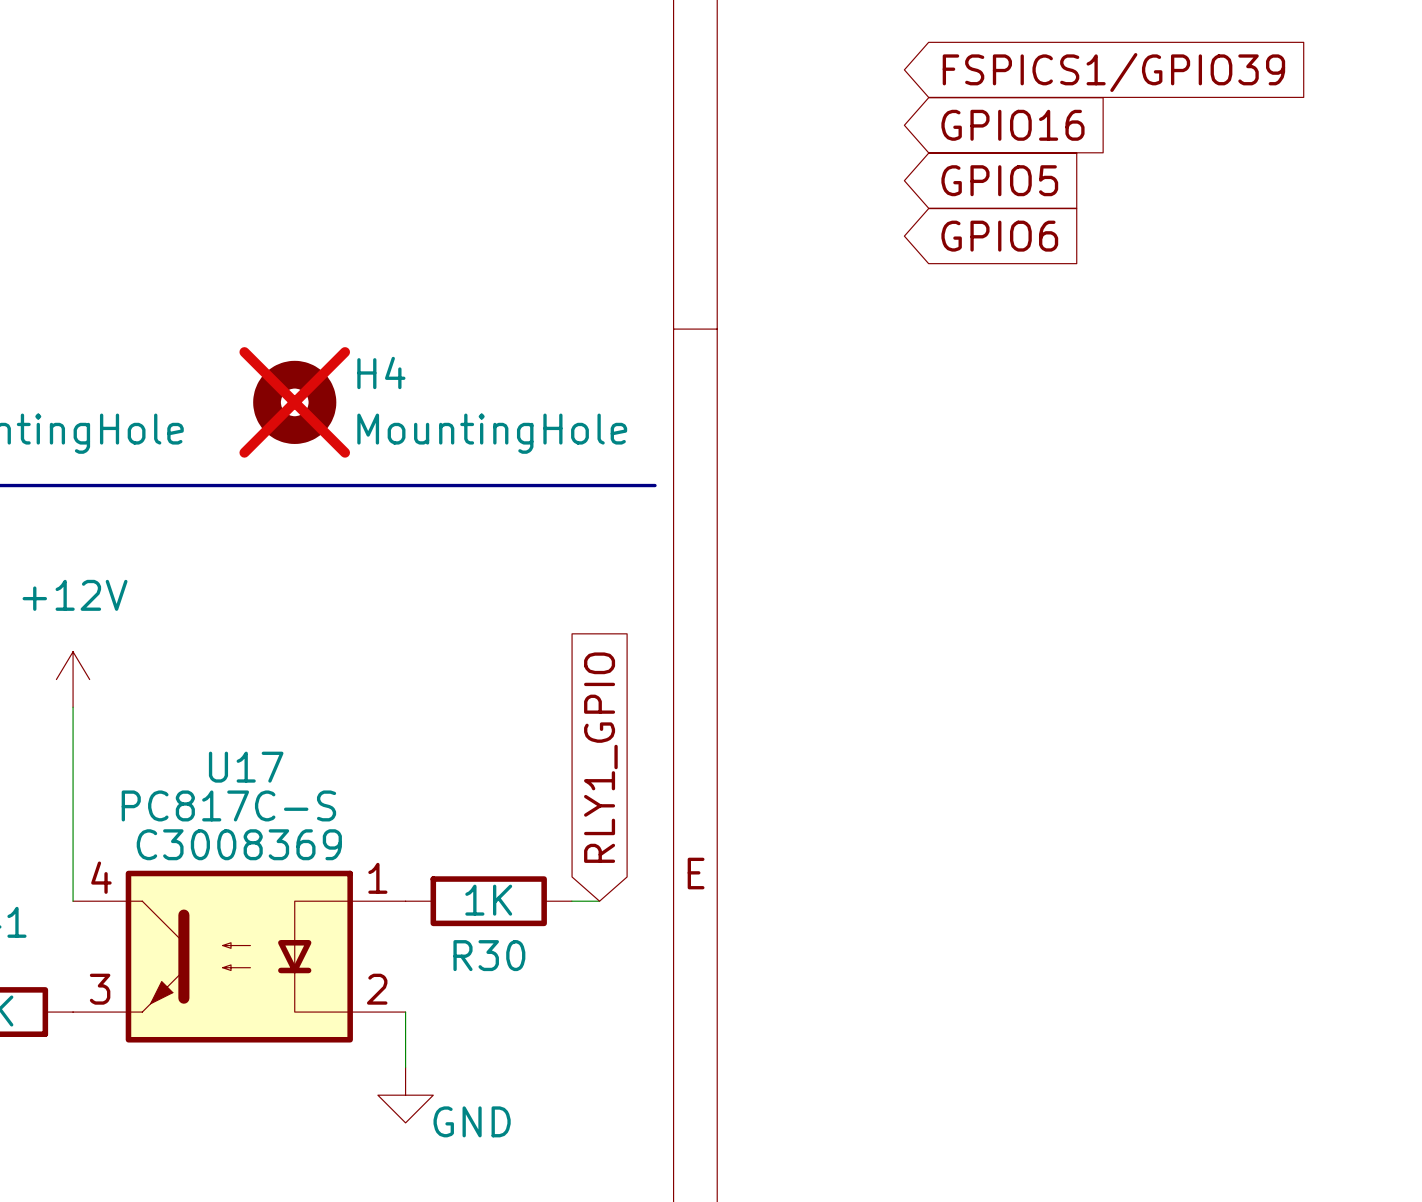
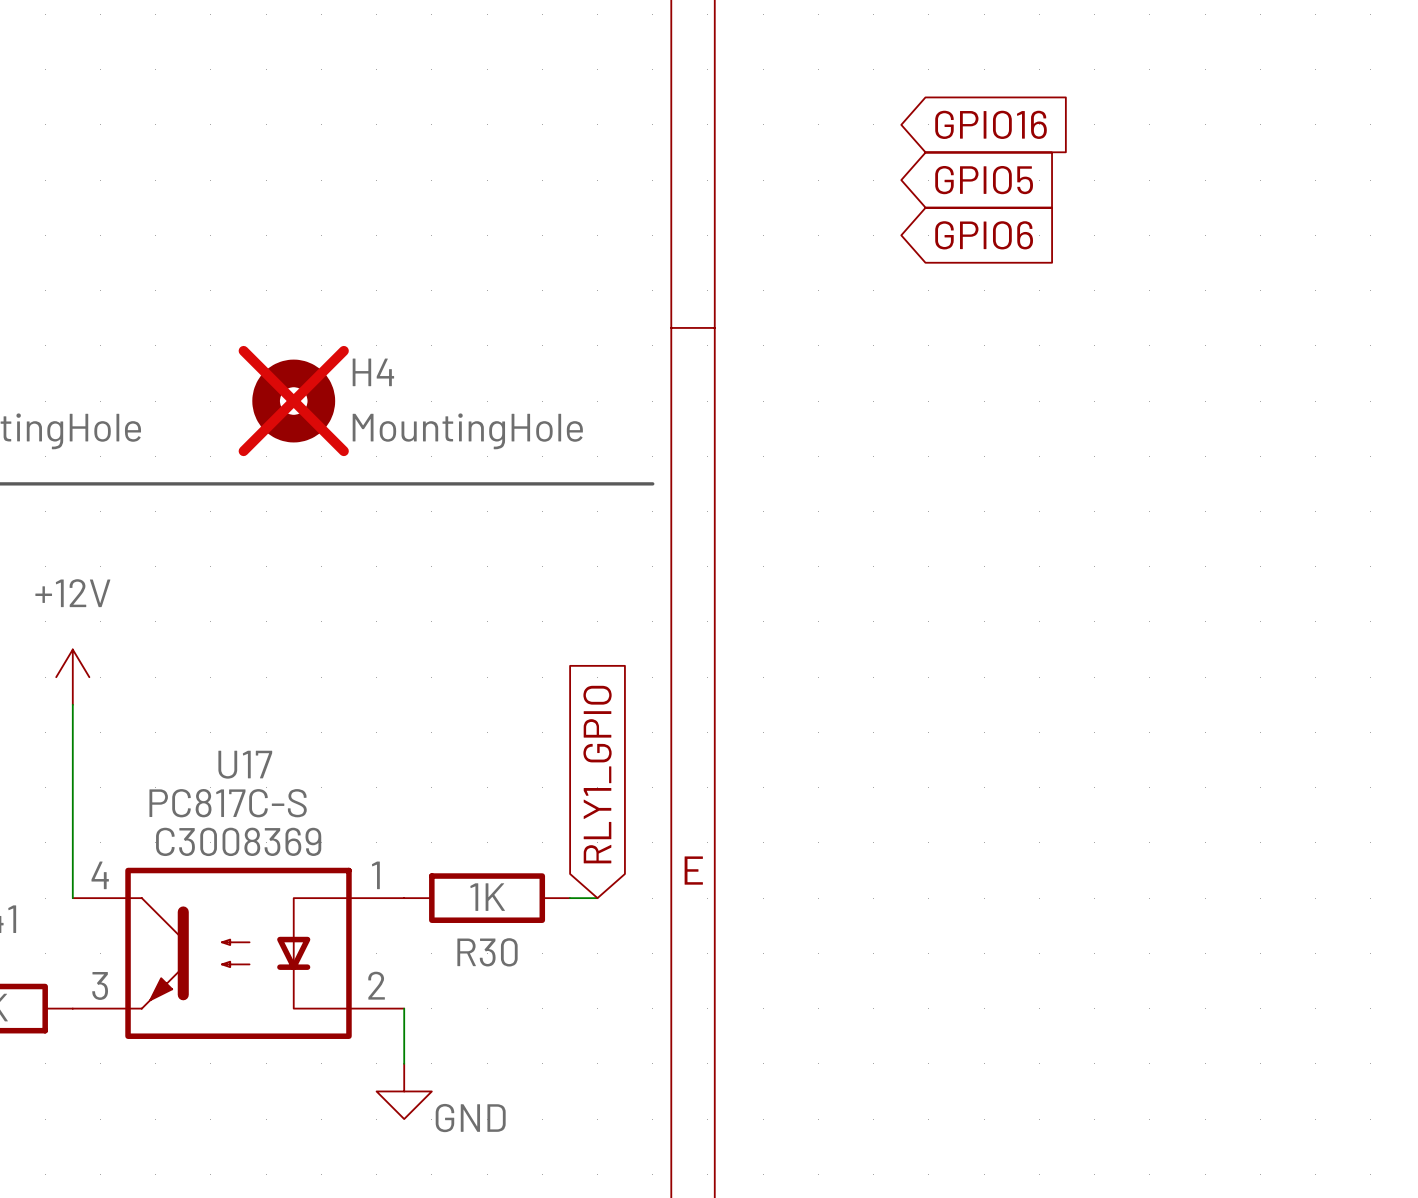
global label: FSPICS1/GPIO39 (1113, 72) -> none

